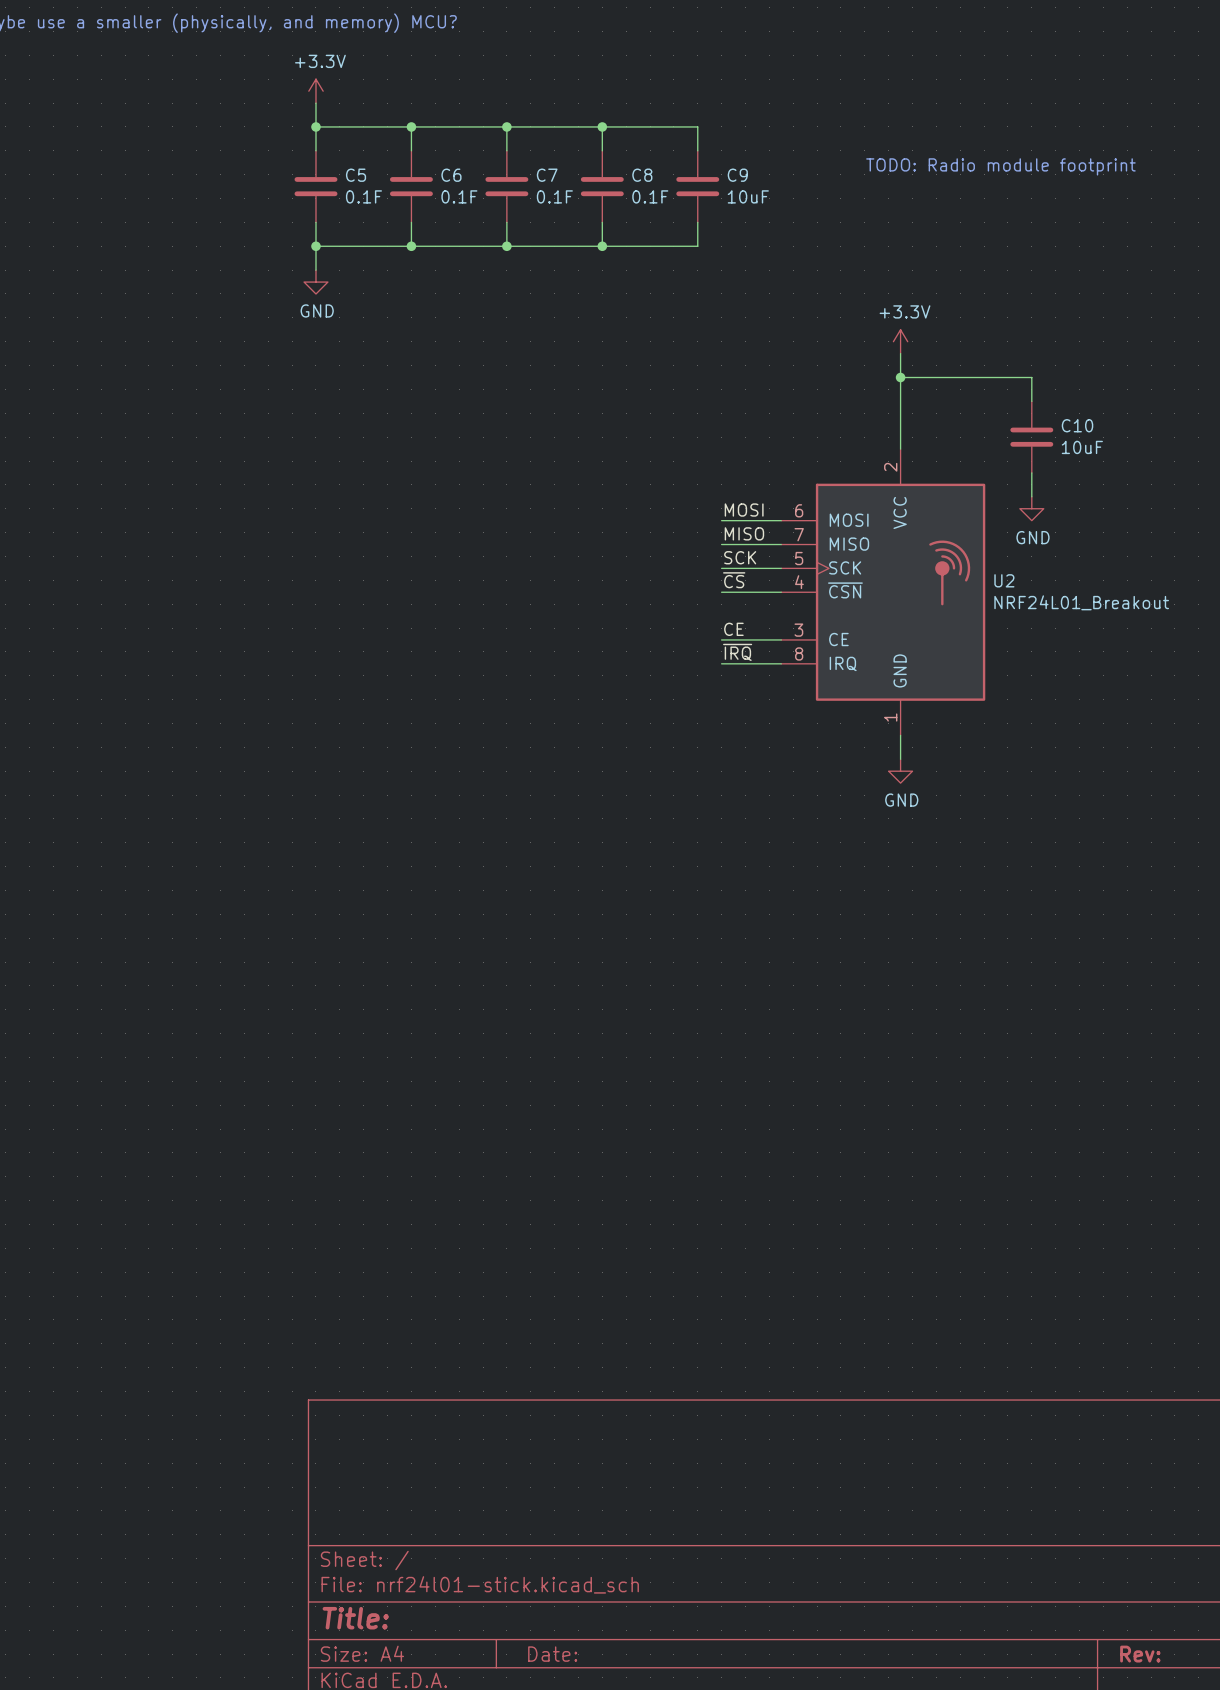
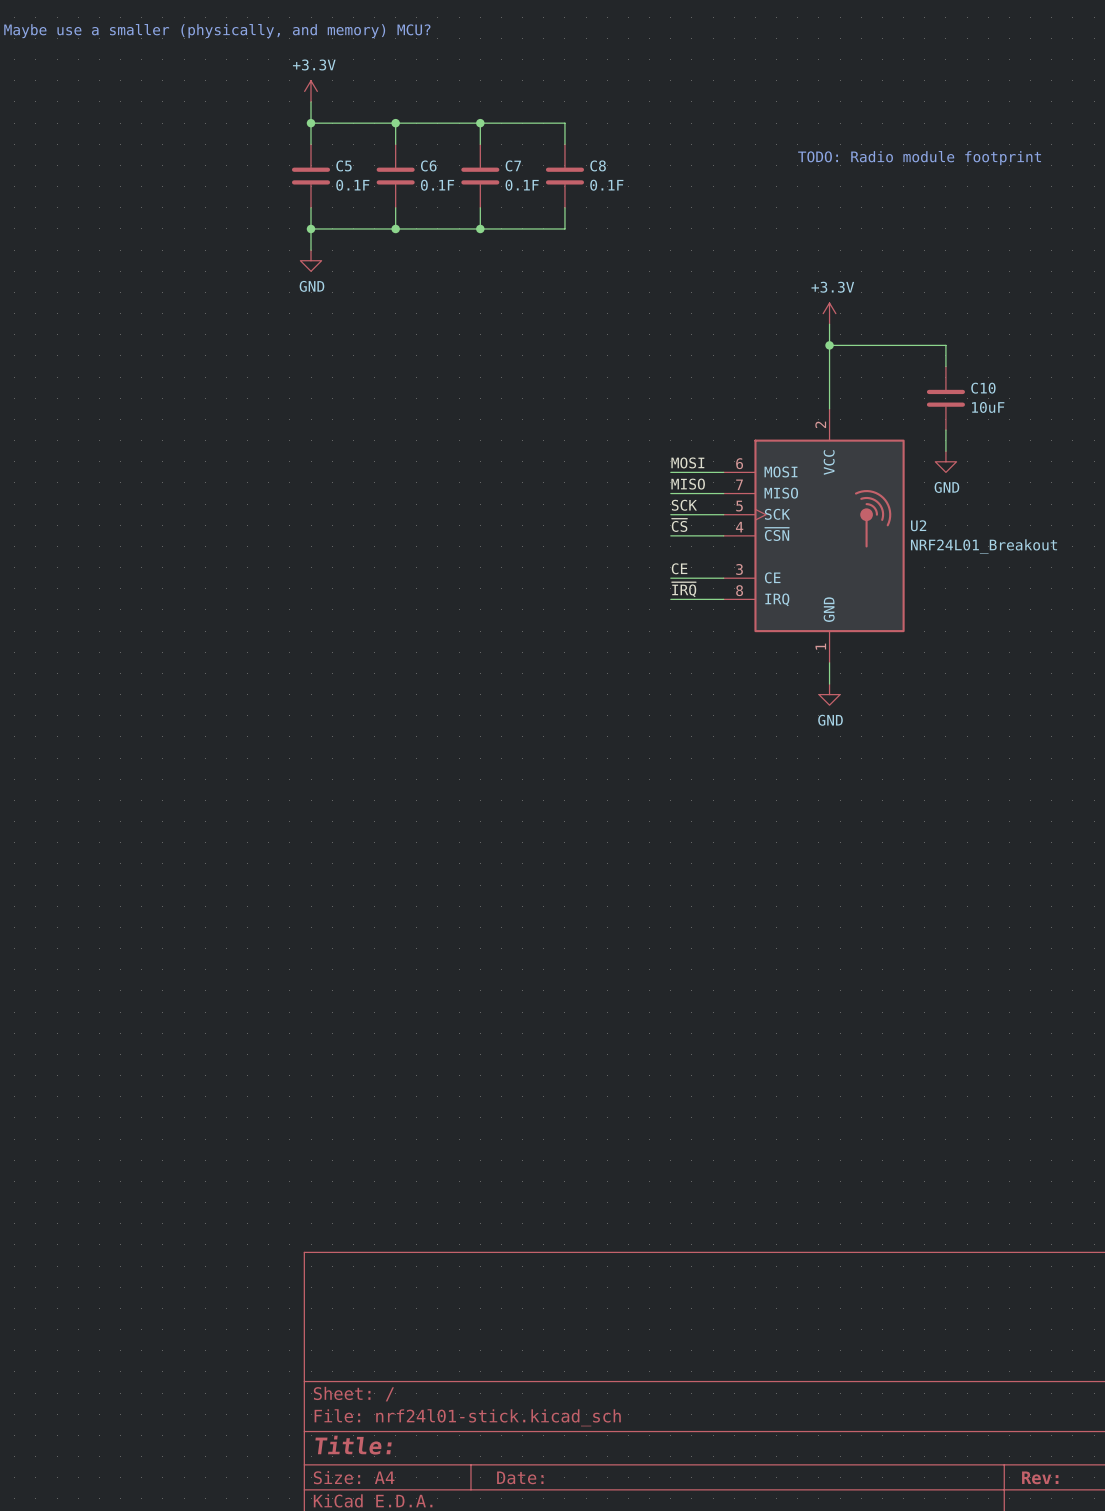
wire: (602, 126) (697, 126) (697, 150) -> none
junction: (602, 126) -> none
C9: 10uF (697, 186) -> none
wire: (697, 222) (697, 246) (602, 246) -> none
junction: (602, 246) -> none

